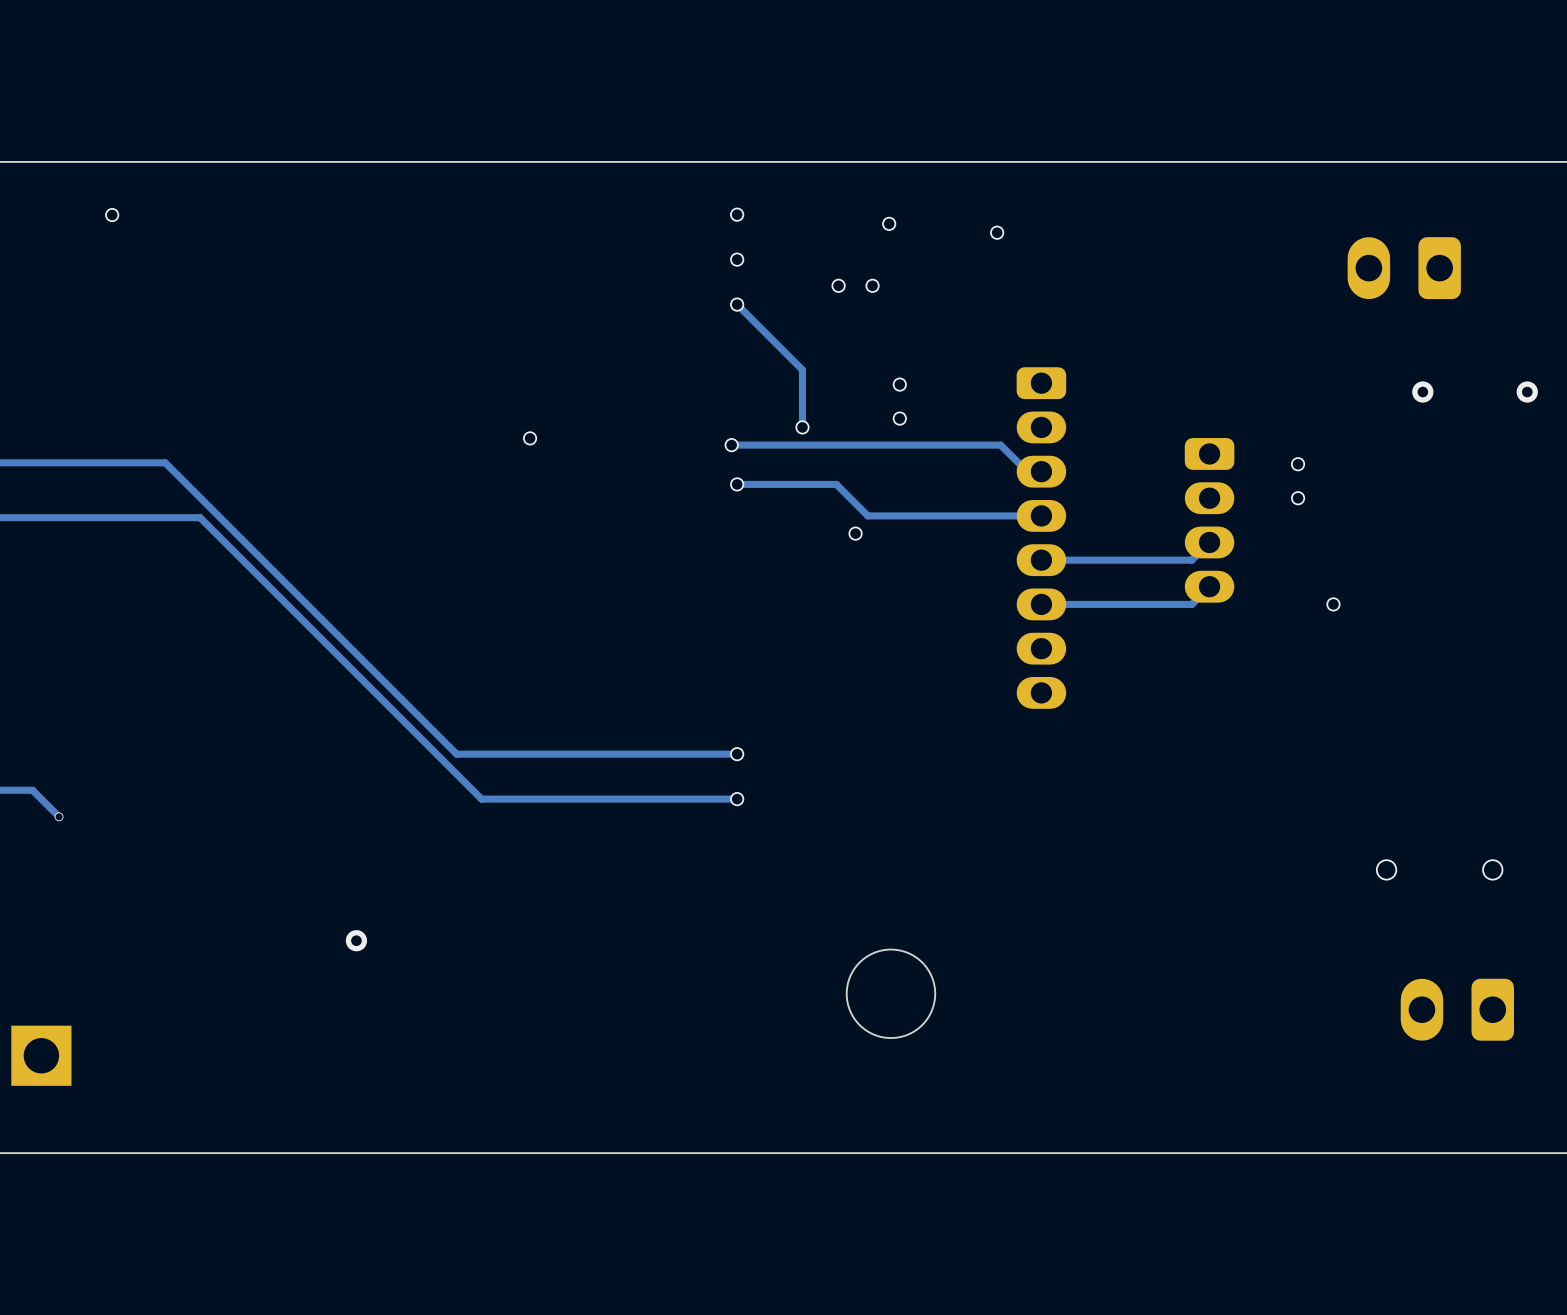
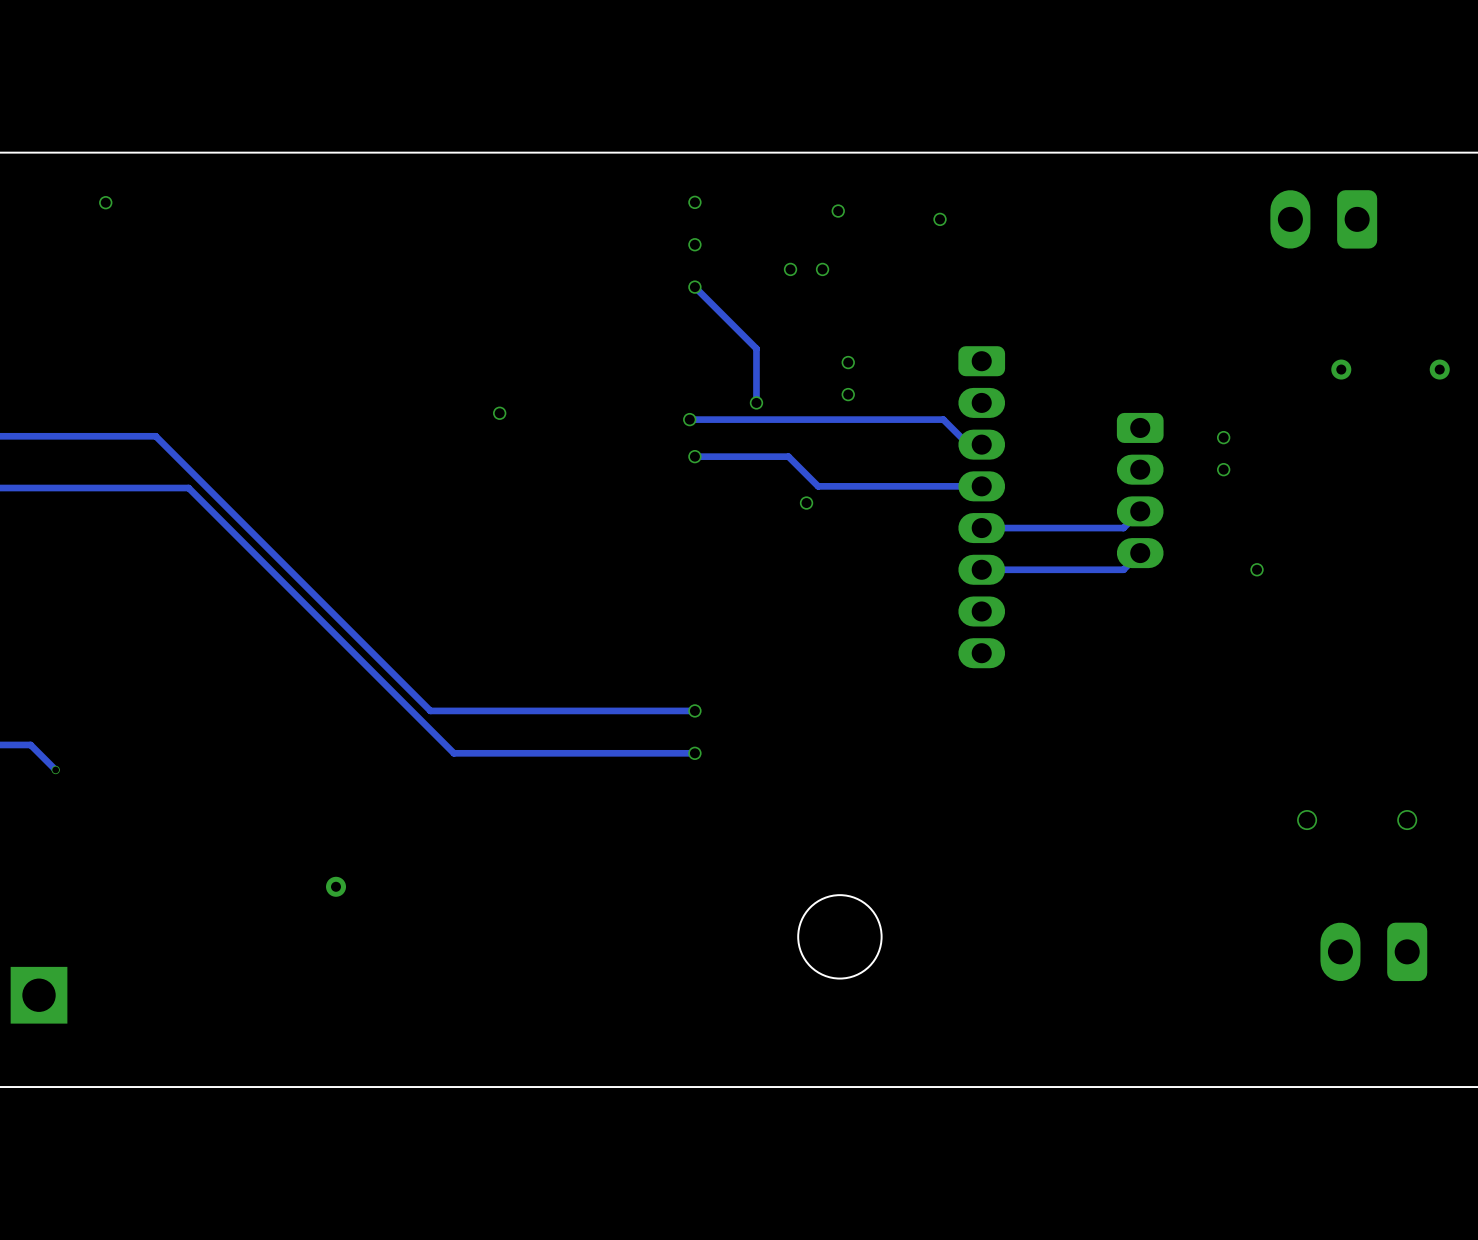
part position: (1404, 268) -> (1323, 219)

